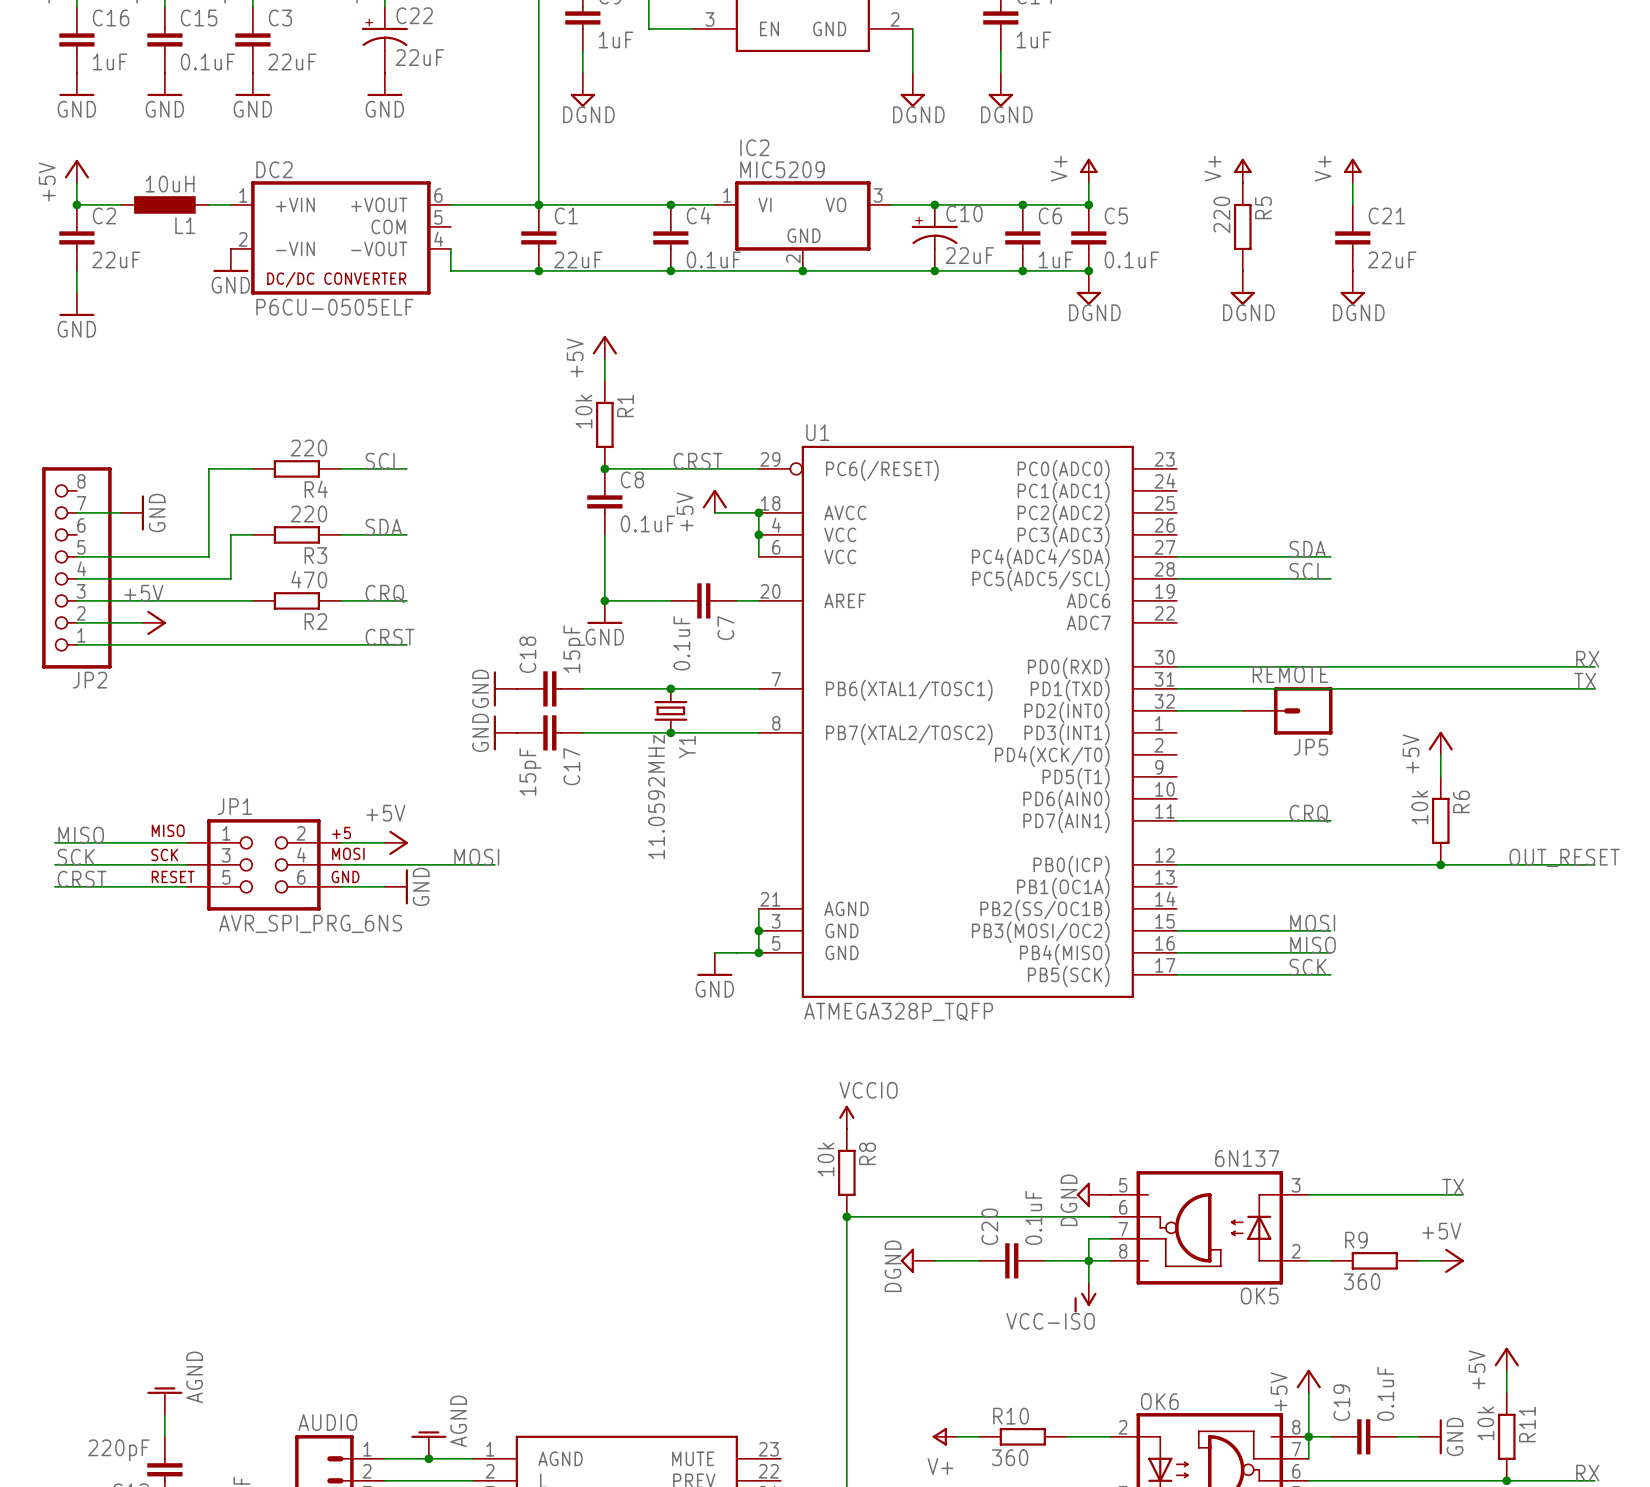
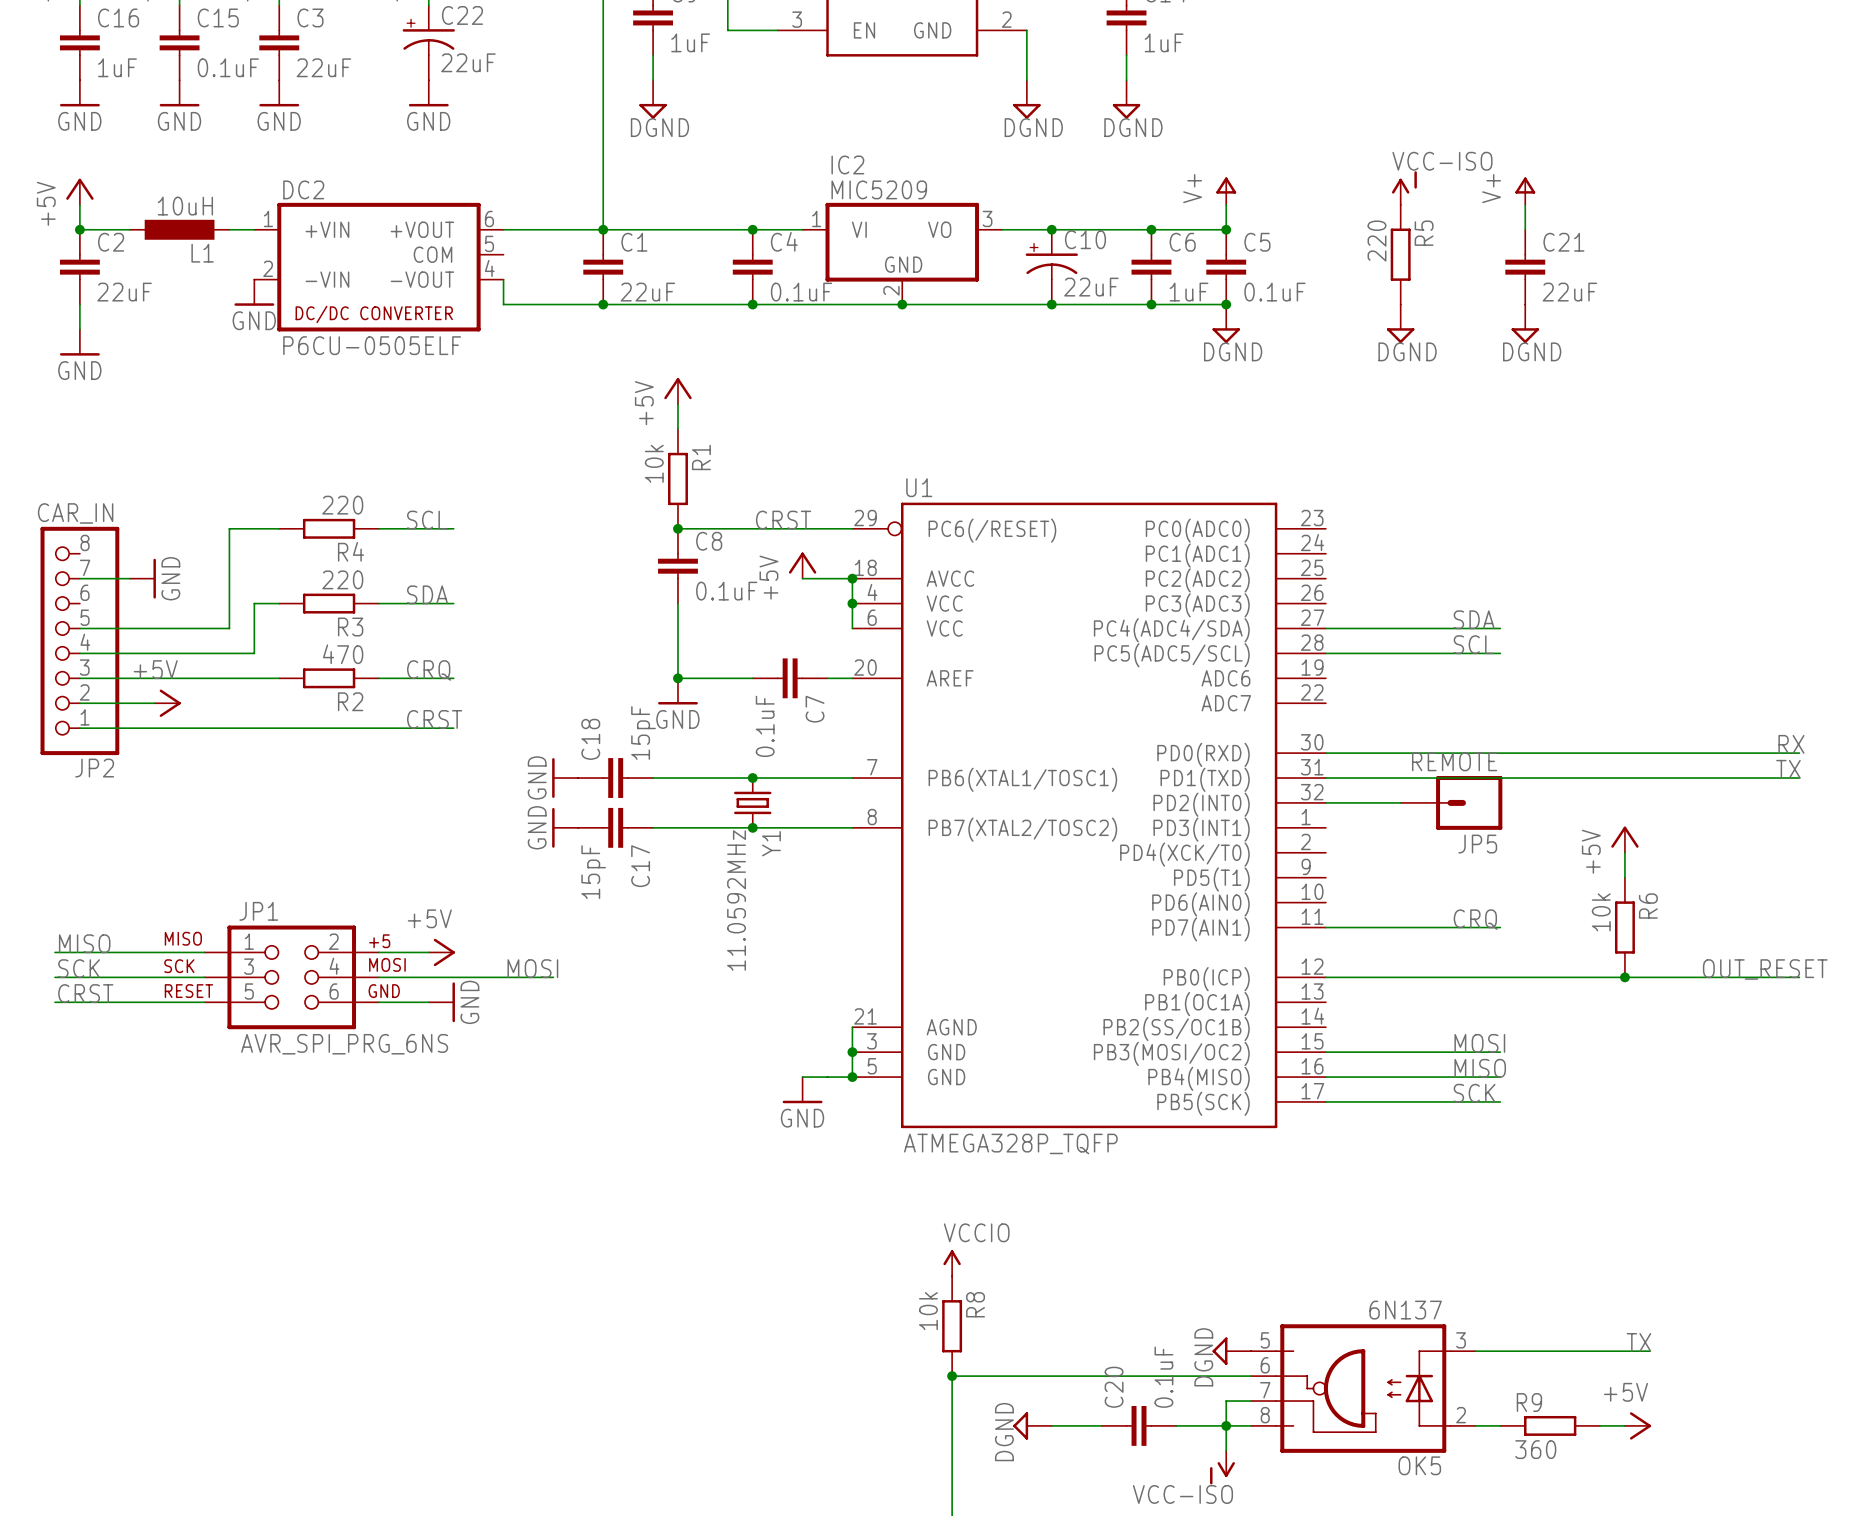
power symbol: V+ (1242, 170) -> VCC-ISO (1404, 188)
JP2 value: none -> CAR_IN (75, 513)

